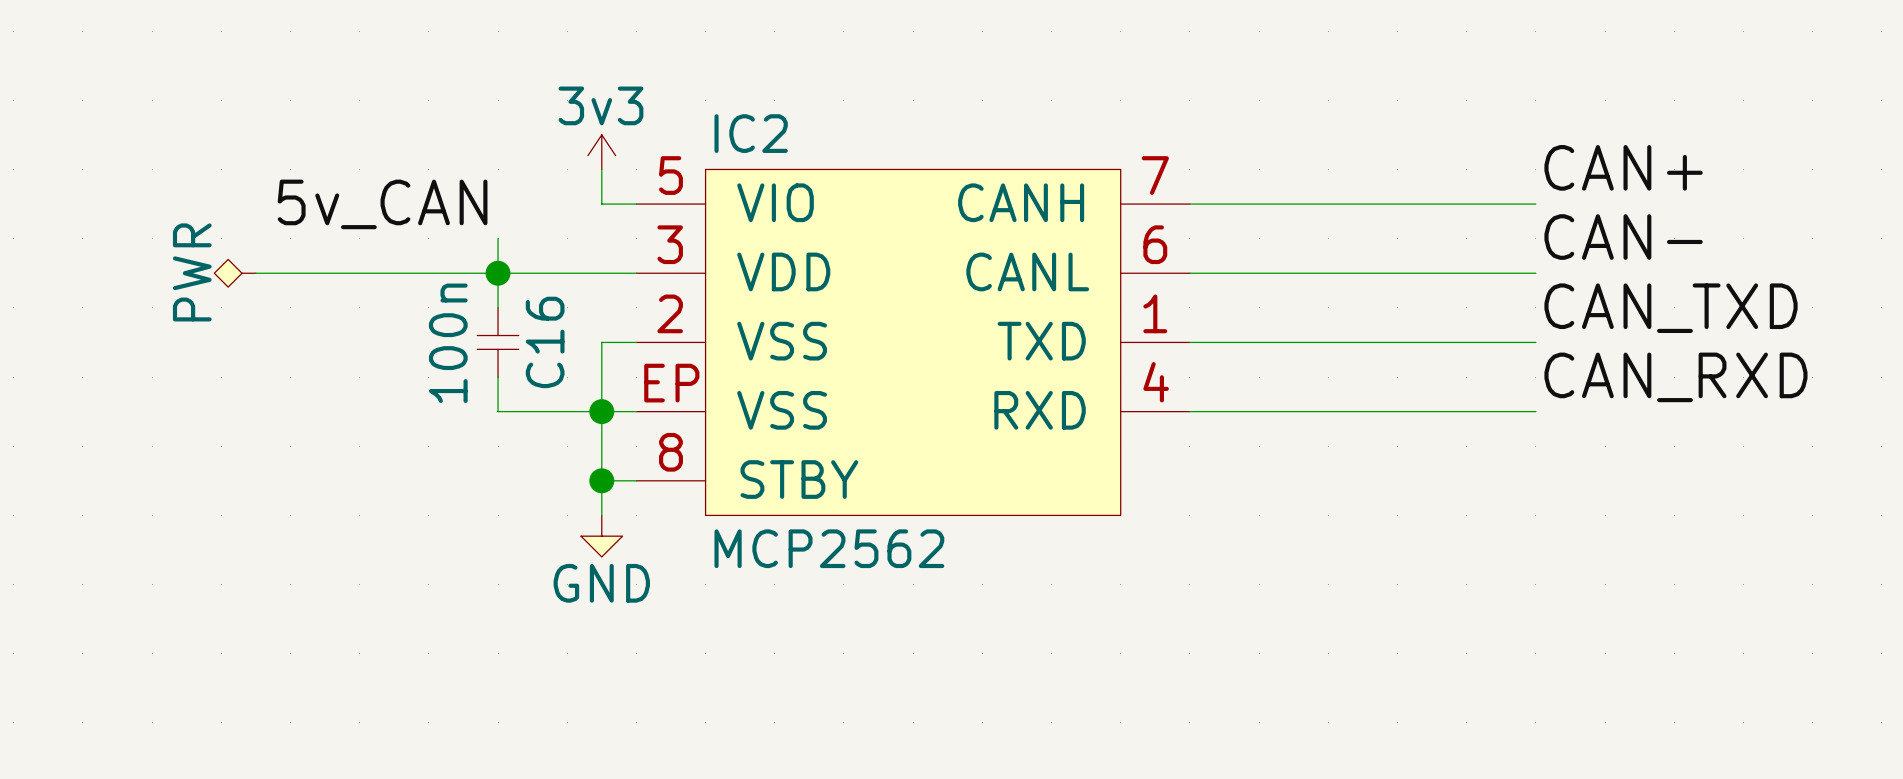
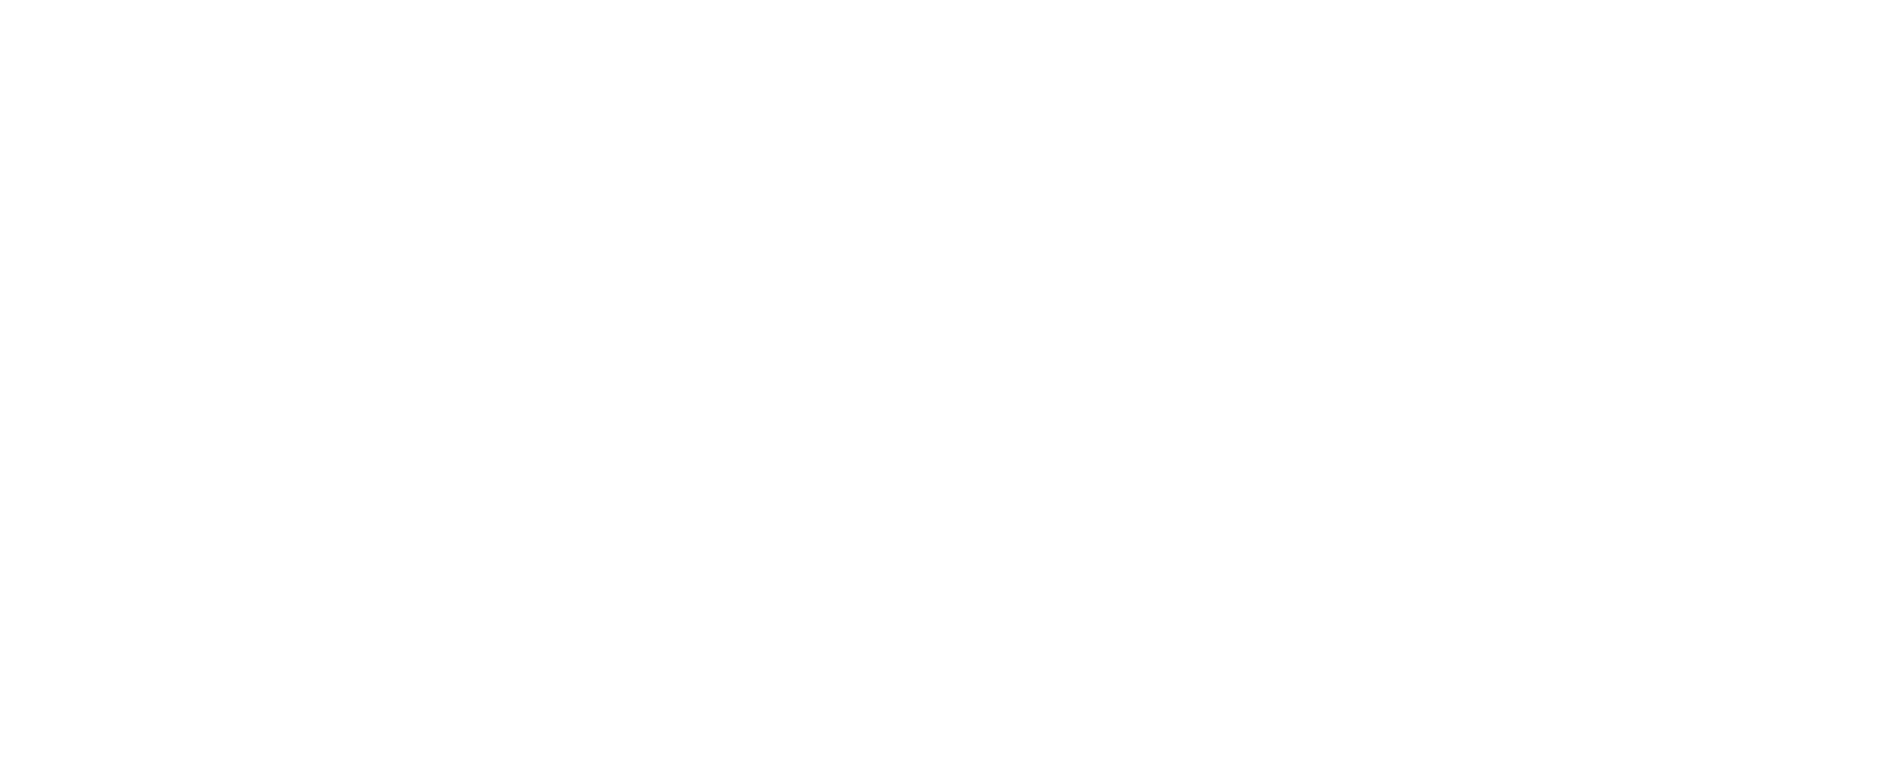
power symbol: 3v3 (601, 152) -> none
label: CAN+ (1623, 167) -> none
wire: (601, 169) (601, 204) (636, 204) -> none
label: 5v_CAN (382, 204) -> none
wire: (1189, 204) (1535, 204) -> none
label: CAN- (1623, 237) -> none
wire: (498, 238) (498, 307) -> none
power symbol: PWR (235, 273) -> none
wire: (255, 273) (636, 273) -> none
junction: (498, 273) -> none
wire: (1189, 273) (1535, 273) -> none
label: CAN_TXD (1671, 308) -> none
C16: 100n (498, 342) -> none
wire: (636, 342) (601, 342) (601, 515) -> none
IC2: MCP2562 (913, 342) -> none
wire: (1189, 342) (1535, 342) -> none
wire: (498, 377) (498, 411) (636, 411) -> none
label: CAN_RXD (1675, 377) -> none
junction: (601, 411) -> none
wire: (1189, 411) (1535, 411) -> none
wire: (601, 480) (636, 480) -> none
junction: (601, 480) -> none
power symbol: GND (601, 536) -> none

